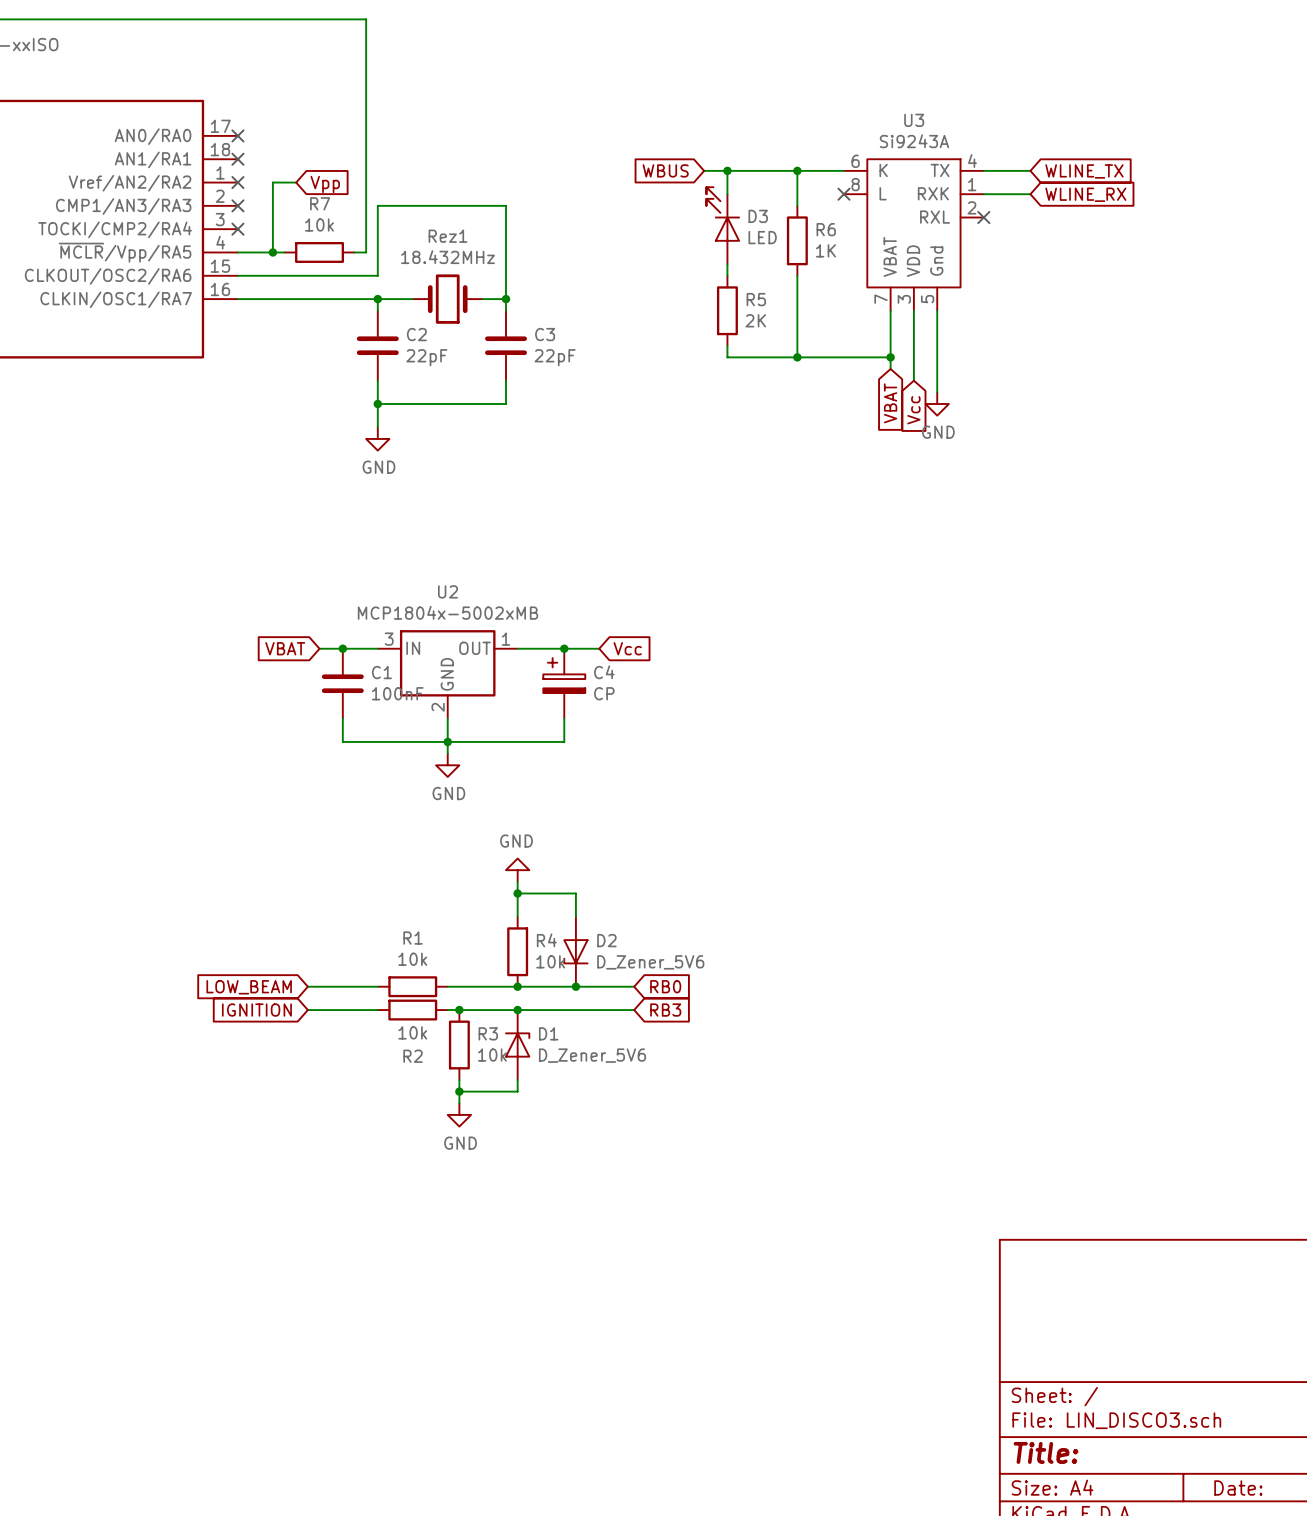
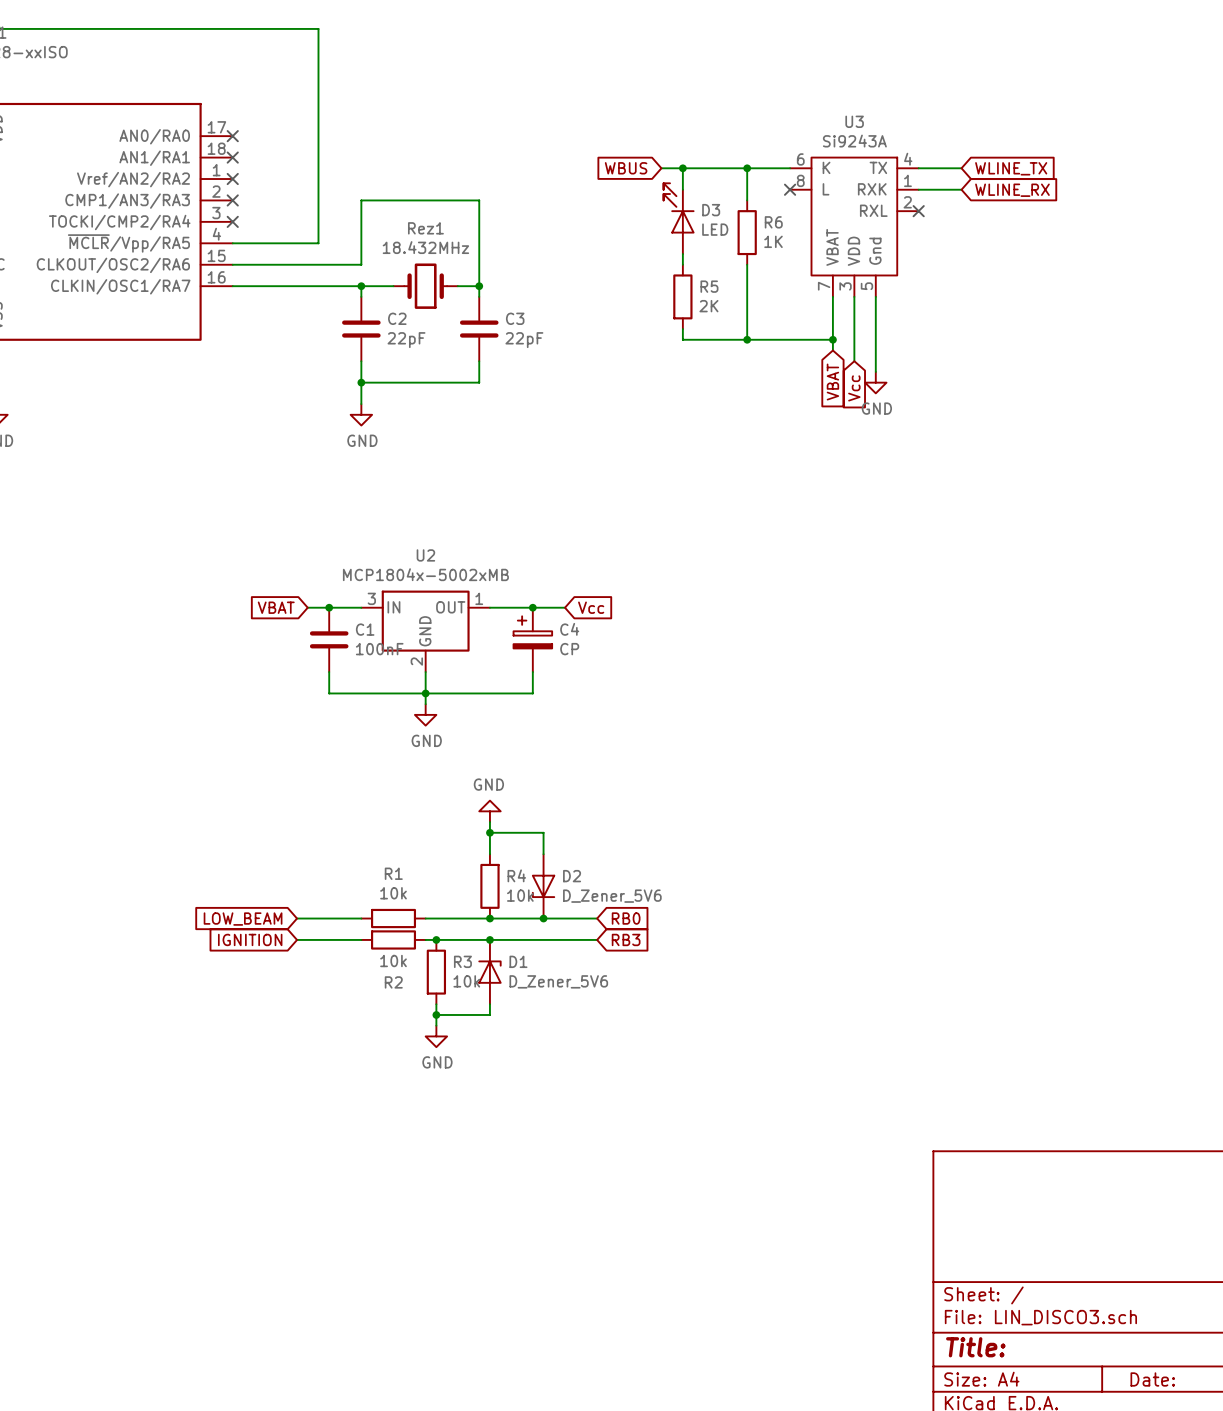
wire: (331, 19) (366, 19) (366, 252) (354, 252) -> (318, 28) (318, 243) (275, 243)
wire: (296, 182) (272, 182) (272, 252) -> none
global label: Vpp (325, 184) -> none
junction: (272, 252) -> none
R7: 10k (319, 252) -> none

